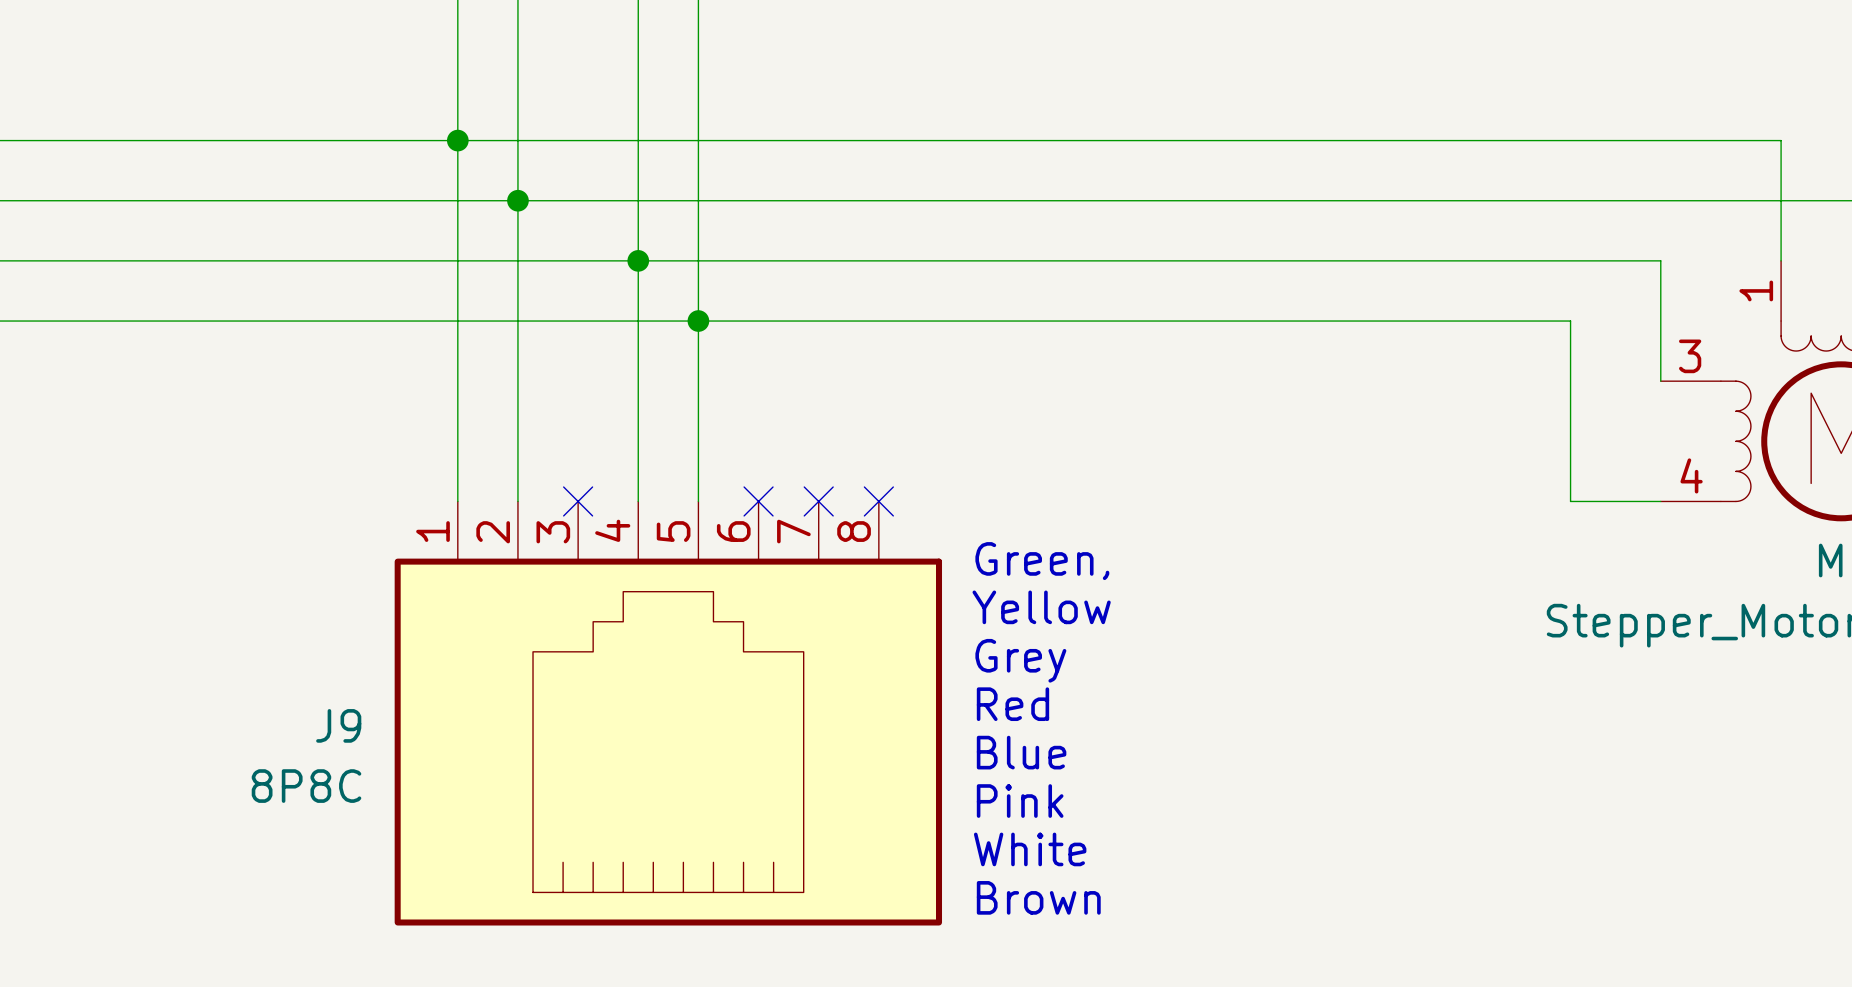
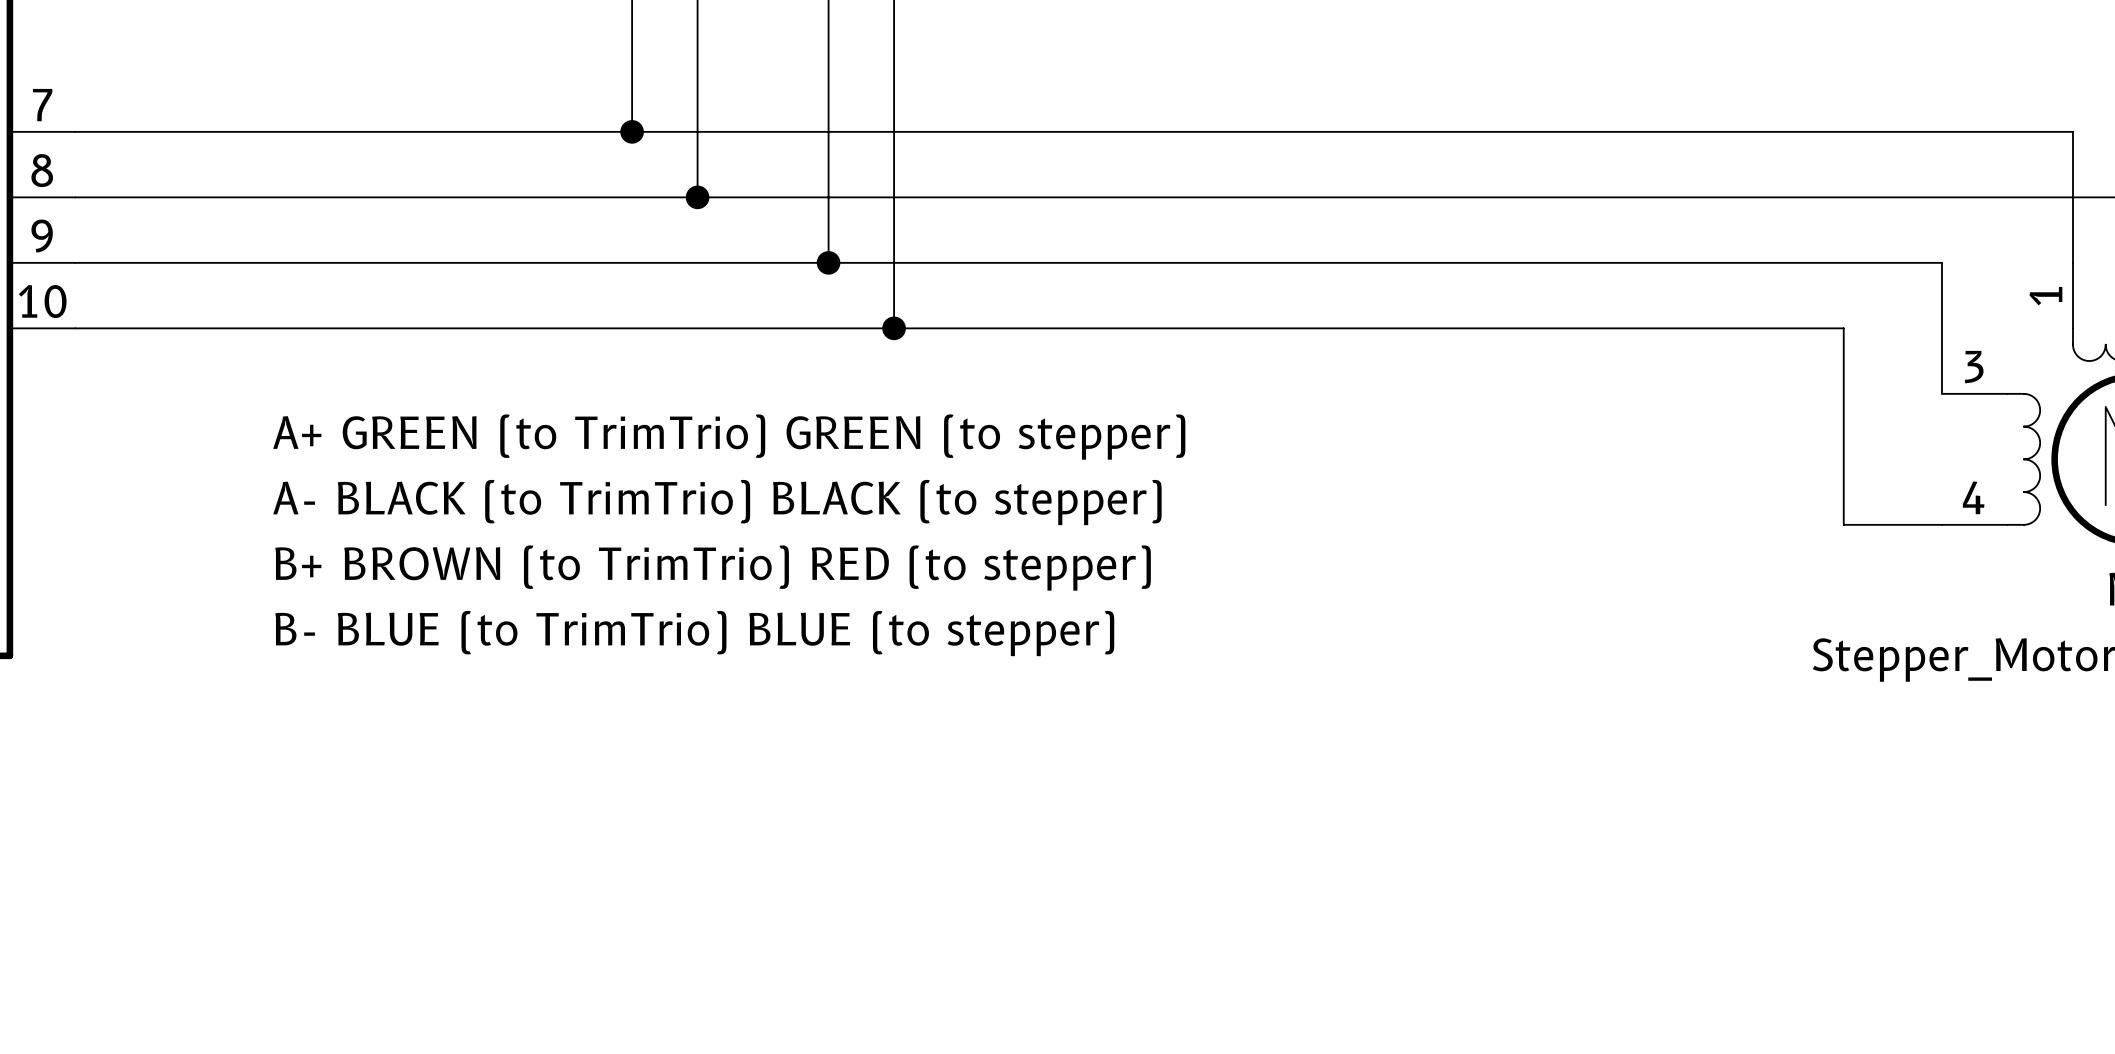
wire: (457, 140) (457, 501) -> none
wire: (517, 200) (517, 501) -> none
wire: (638, 260) (638, 501) -> none
wire: (698, 321) (698, 501) -> none
text: none -> A+ GREEN (to TrimTrio) GREEN (to stepper) (729, 437)
text: none -> A- BLACK (to TrimTrio) BLACK (to stepper) (717, 502)
no-connect mark: (578, 501) -> none
no-connect mark: (758, 501) -> none
no-connect mark: (818, 501) -> none
no-connect mark: (878, 501) -> none
text: none -> B+ BROWN (to TrimTrio) RED (to stepper) (713, 568)
text: Green, (1042, 561) -> none
text: none -> B- BLUE (to TrimTrio) BLUE (to stepper) (694, 633)
text: Yellow (1041, 607) -> none
text: Grey (1020, 660) -> none
text: Red (1012, 704) -> none
J9: 8P8C (668, 713) -> none
text: Blue (1021, 752) -> none
text: Pink (1020, 801) -> none
text: White (1030, 849) -> none
text: Brown (1038, 897) -> none

